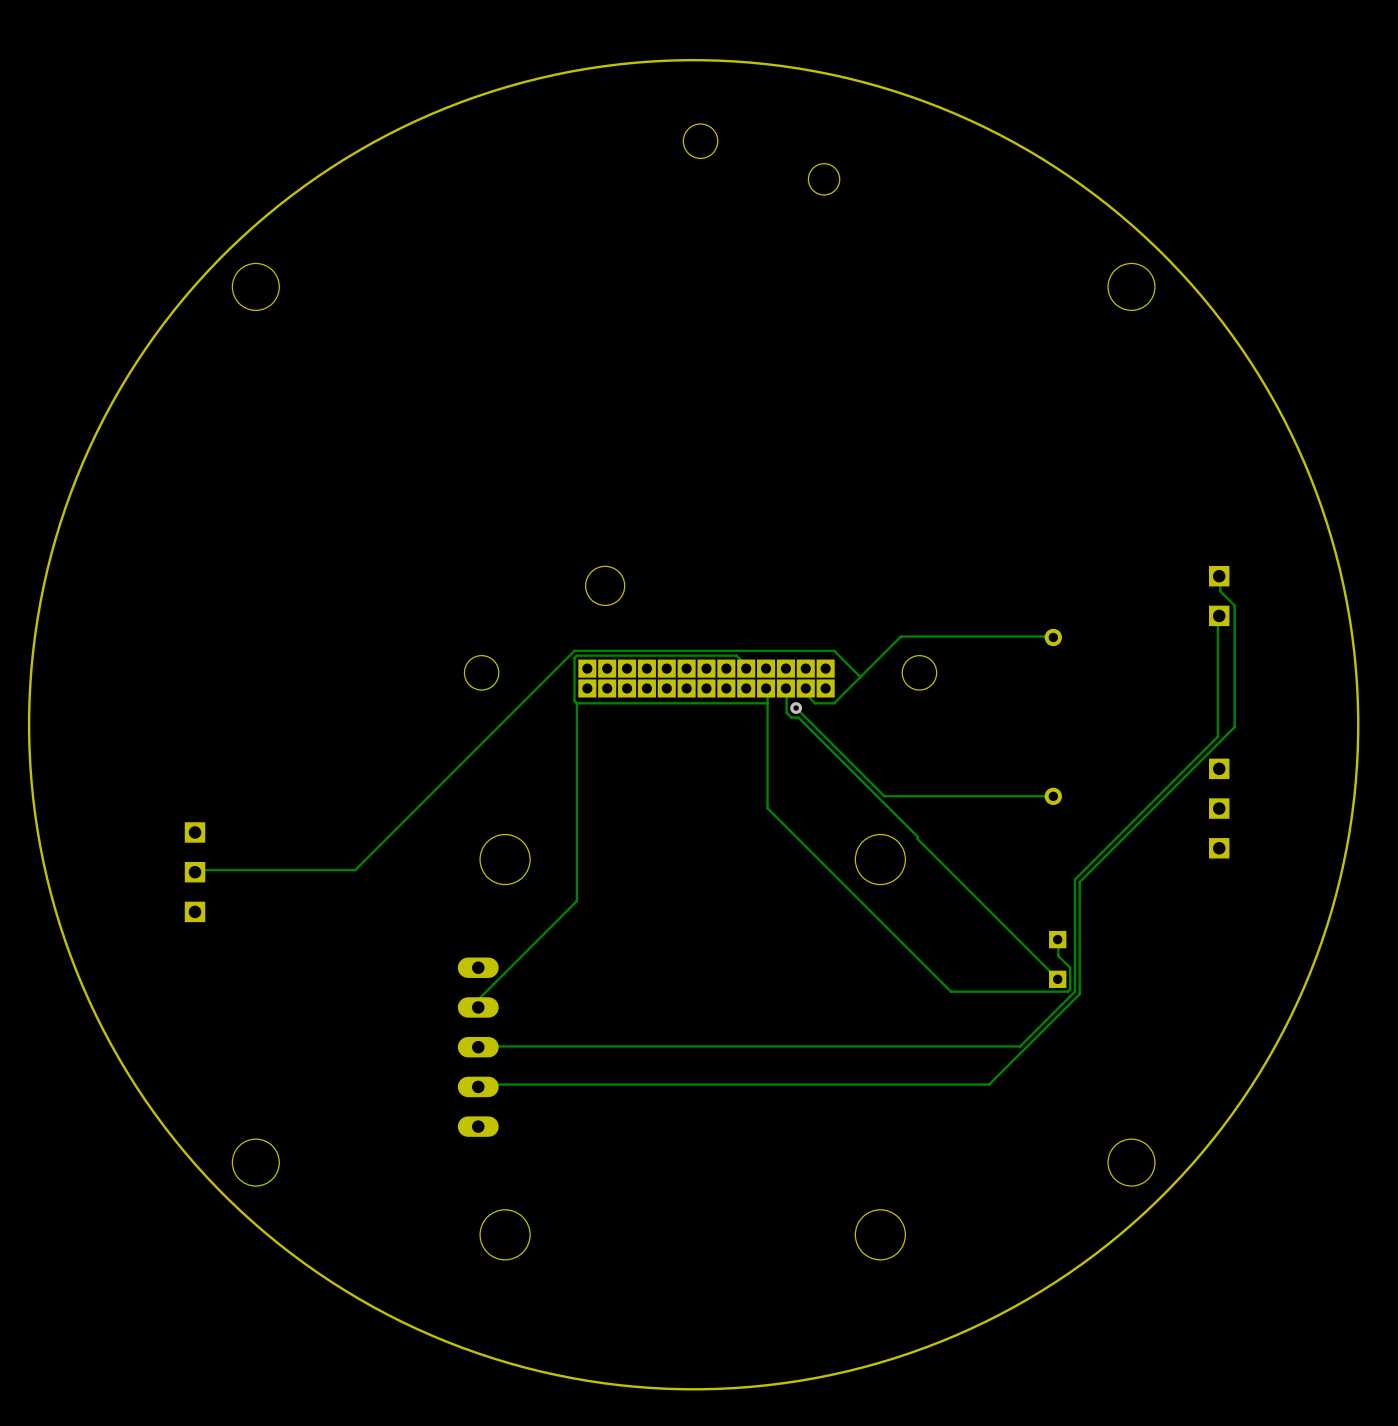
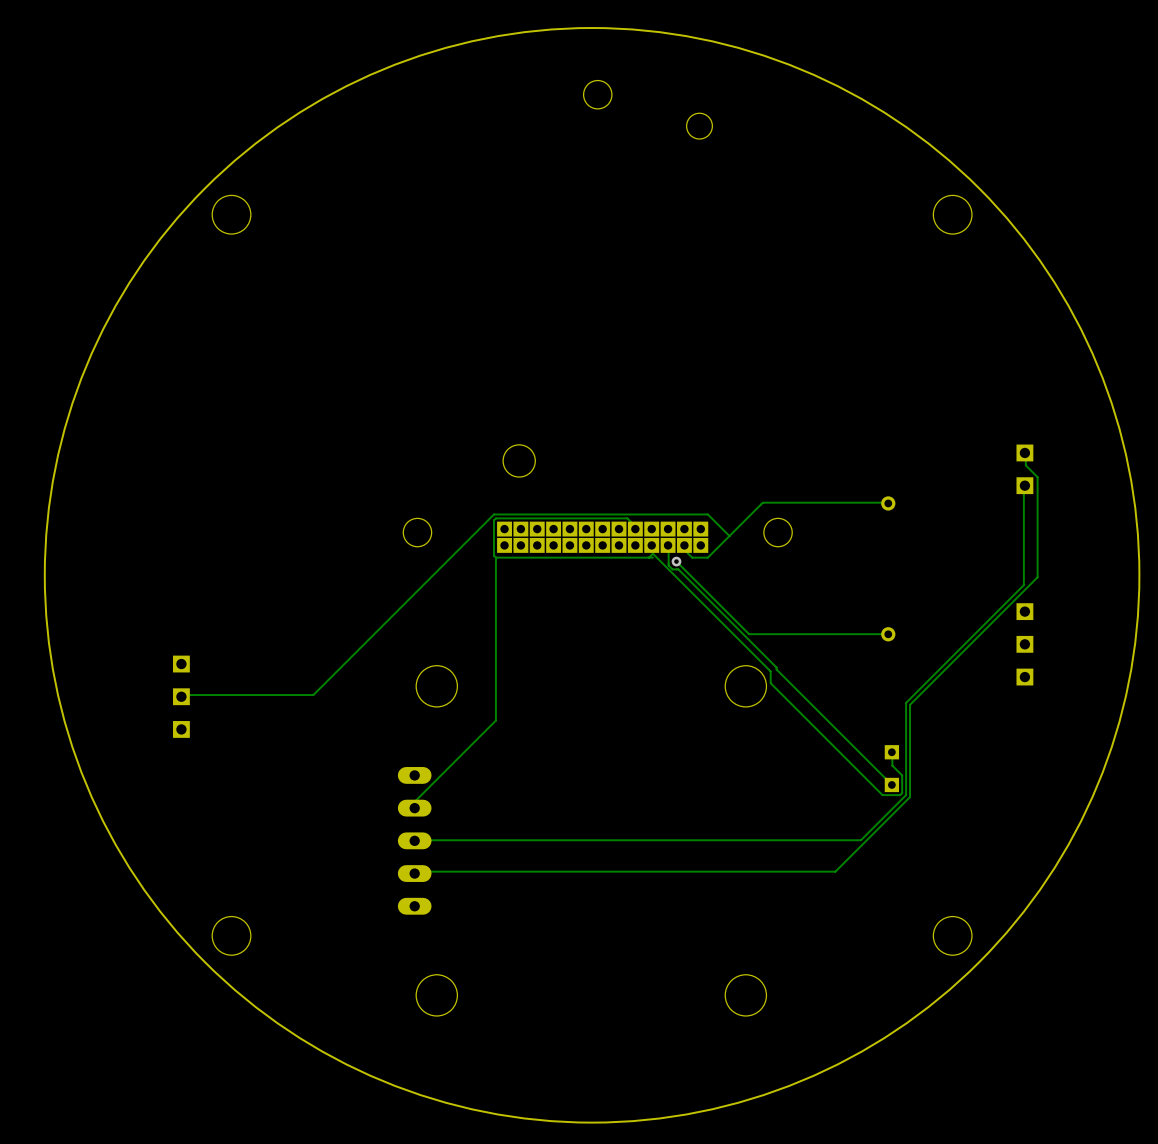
track: (767, 698) (767, 808) (951, 991) (1046, 991) -> (649, 557) (652, 553) (770, 671) (770, 683) (882, 795)

